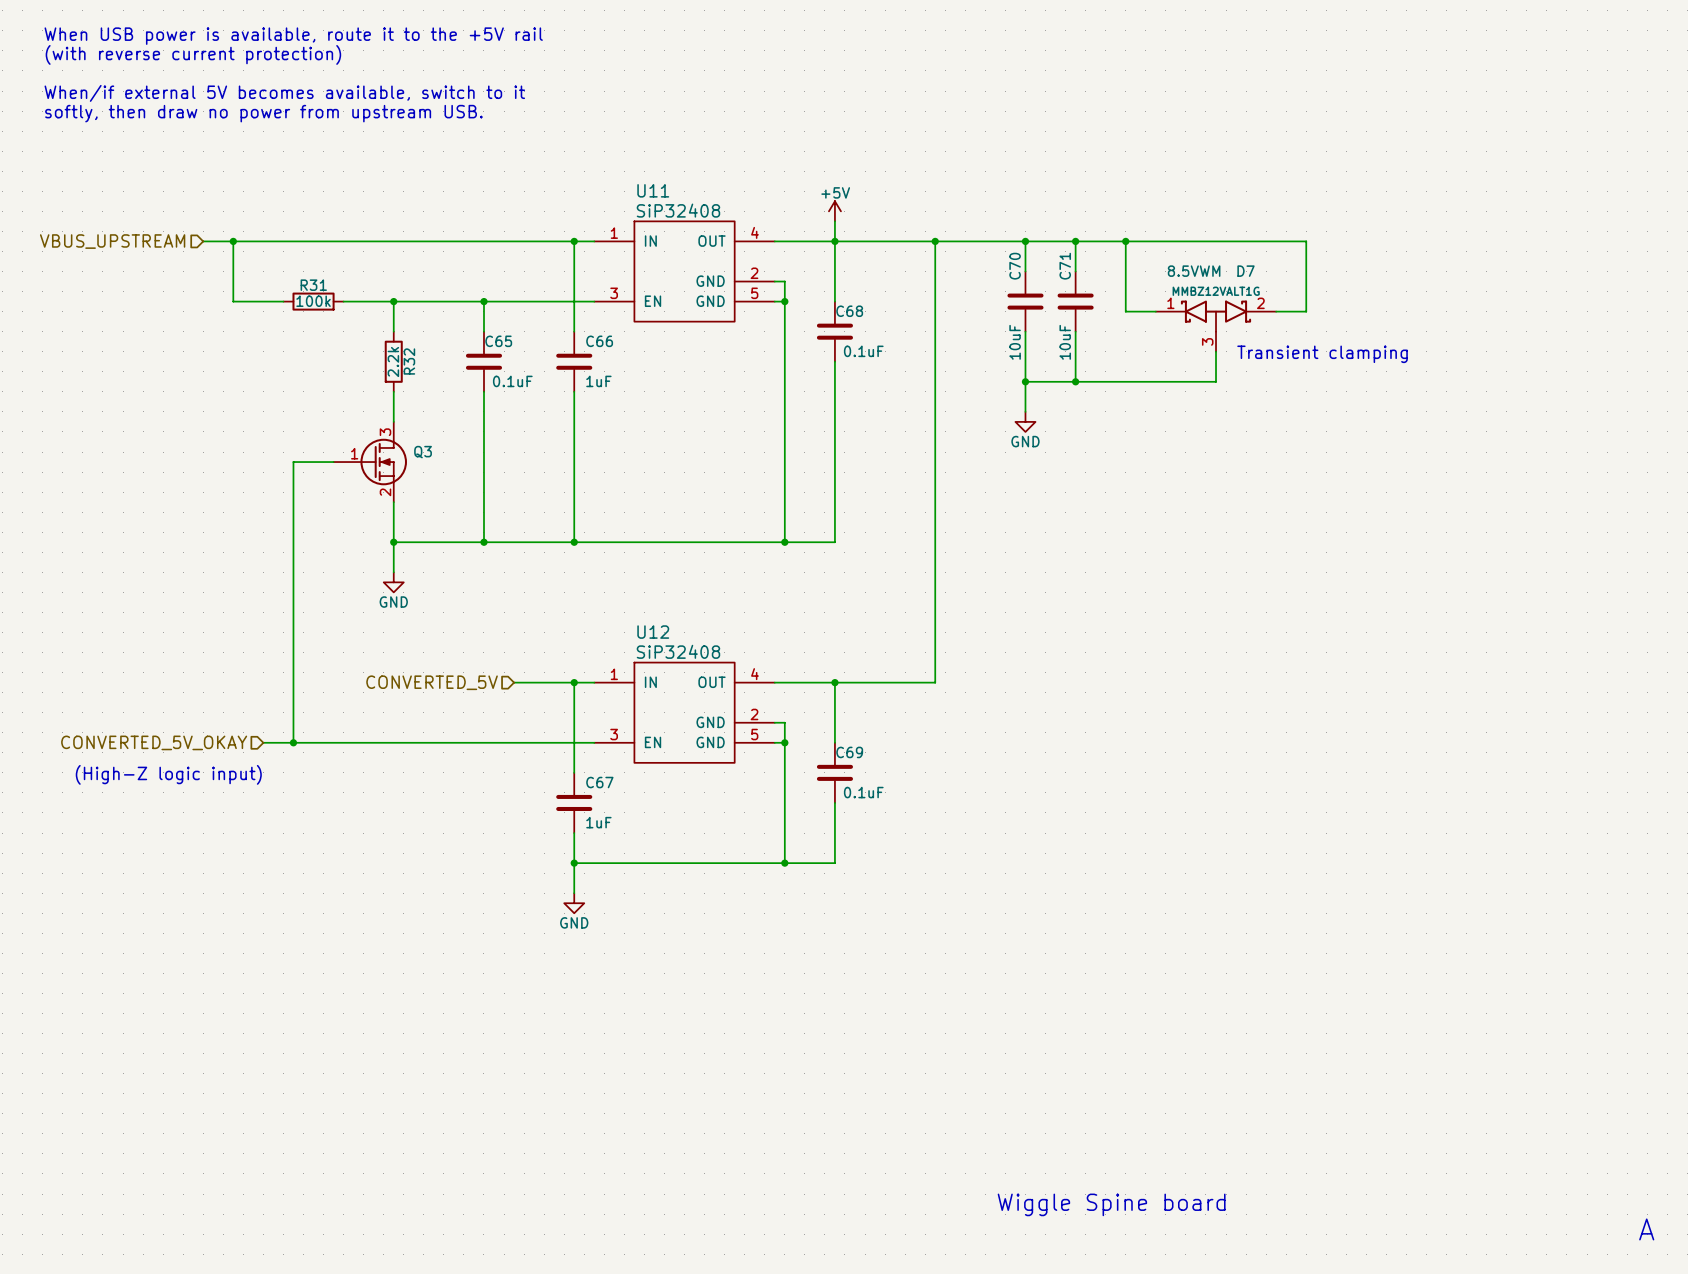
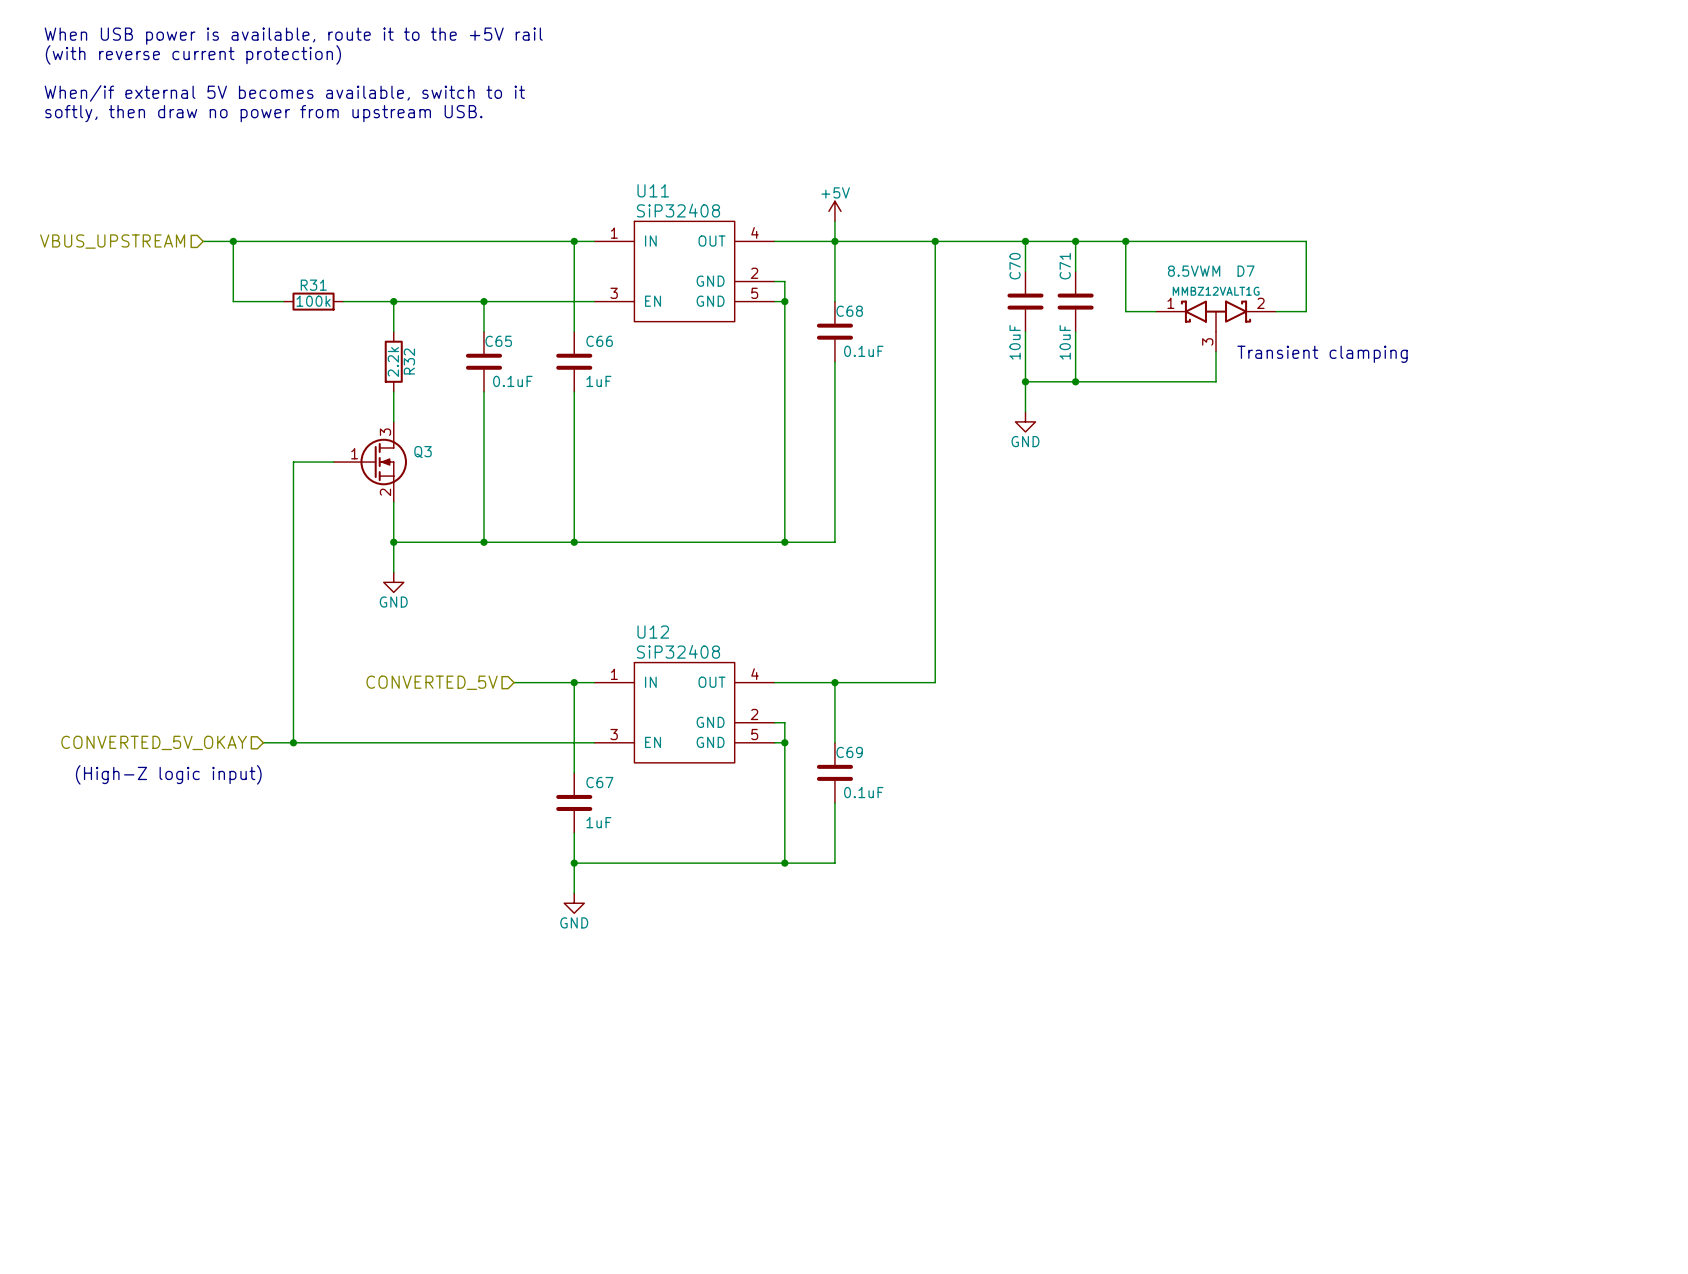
text: Wiggle Spine board (1111, 1204) -> none
text: A (1646, 1229) -> none

